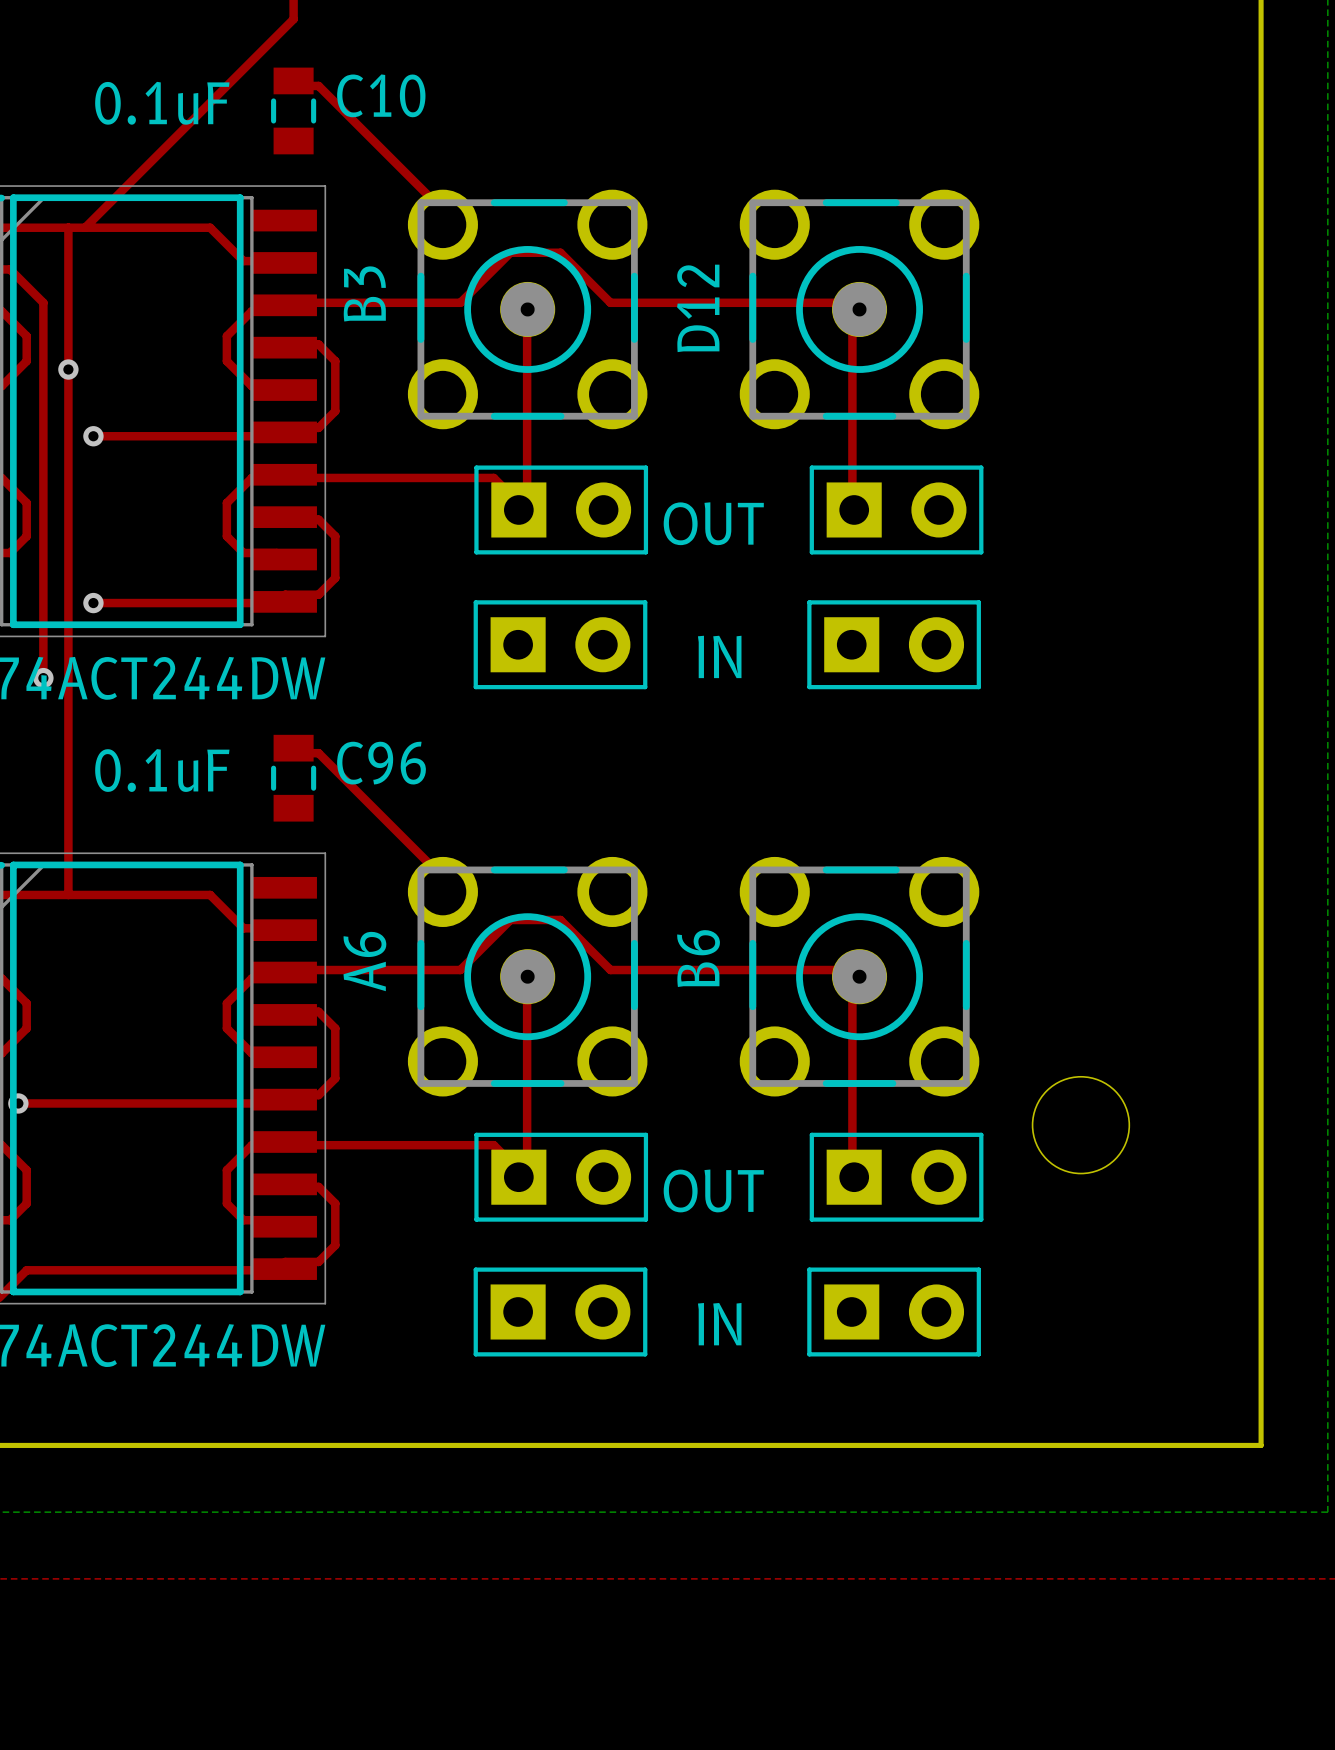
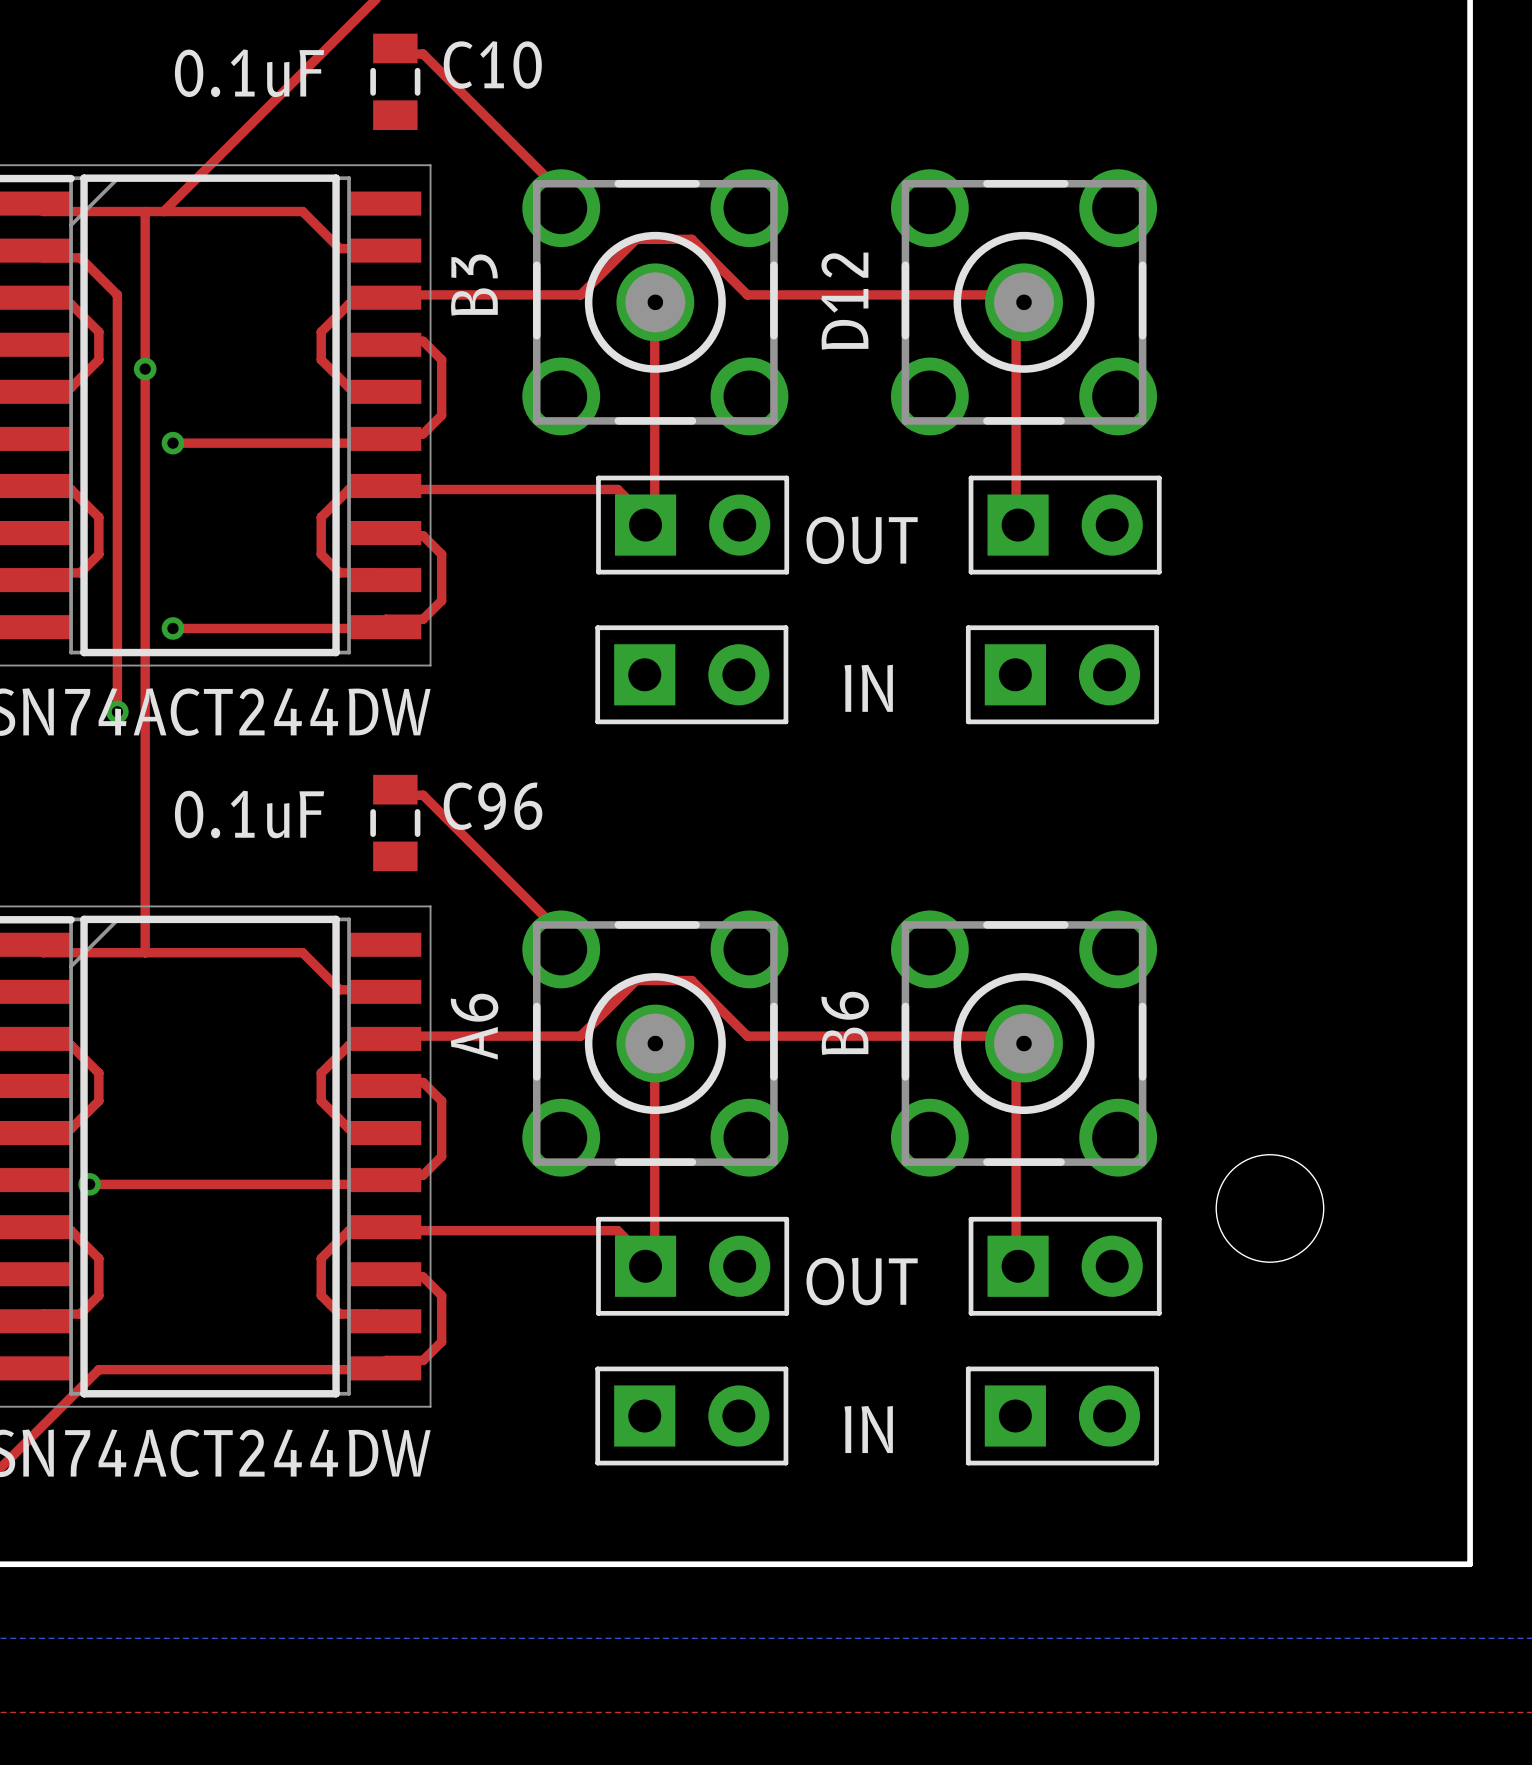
B3 footprint: [407, 189, 648, 430] -> [522, 169, 789, 436]
D12 footprint: [739, 189, 980, 430] -> [890, 169, 1158, 436]
A6 footprint: [407, 856, 648, 1097] -> [522, 910, 789, 1177]
B6 footprint: [739, 856, 980, 1097] -> [890, 910, 1158, 1177]

